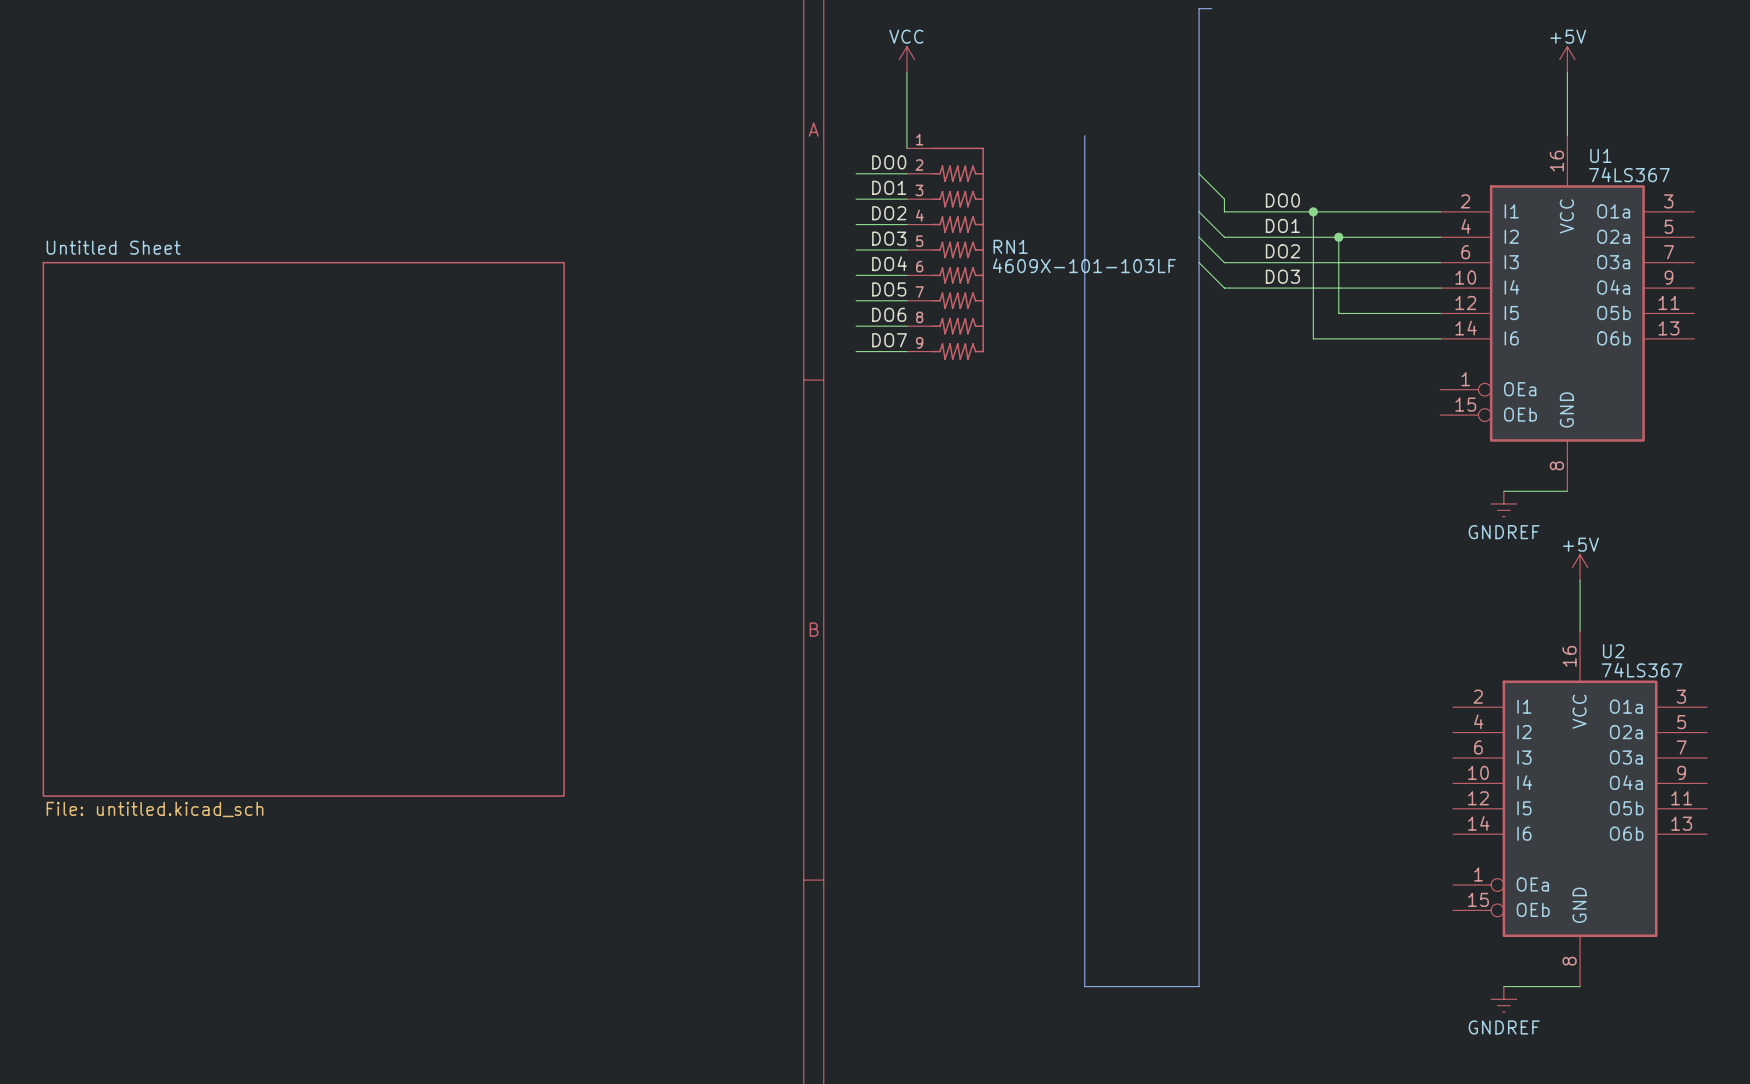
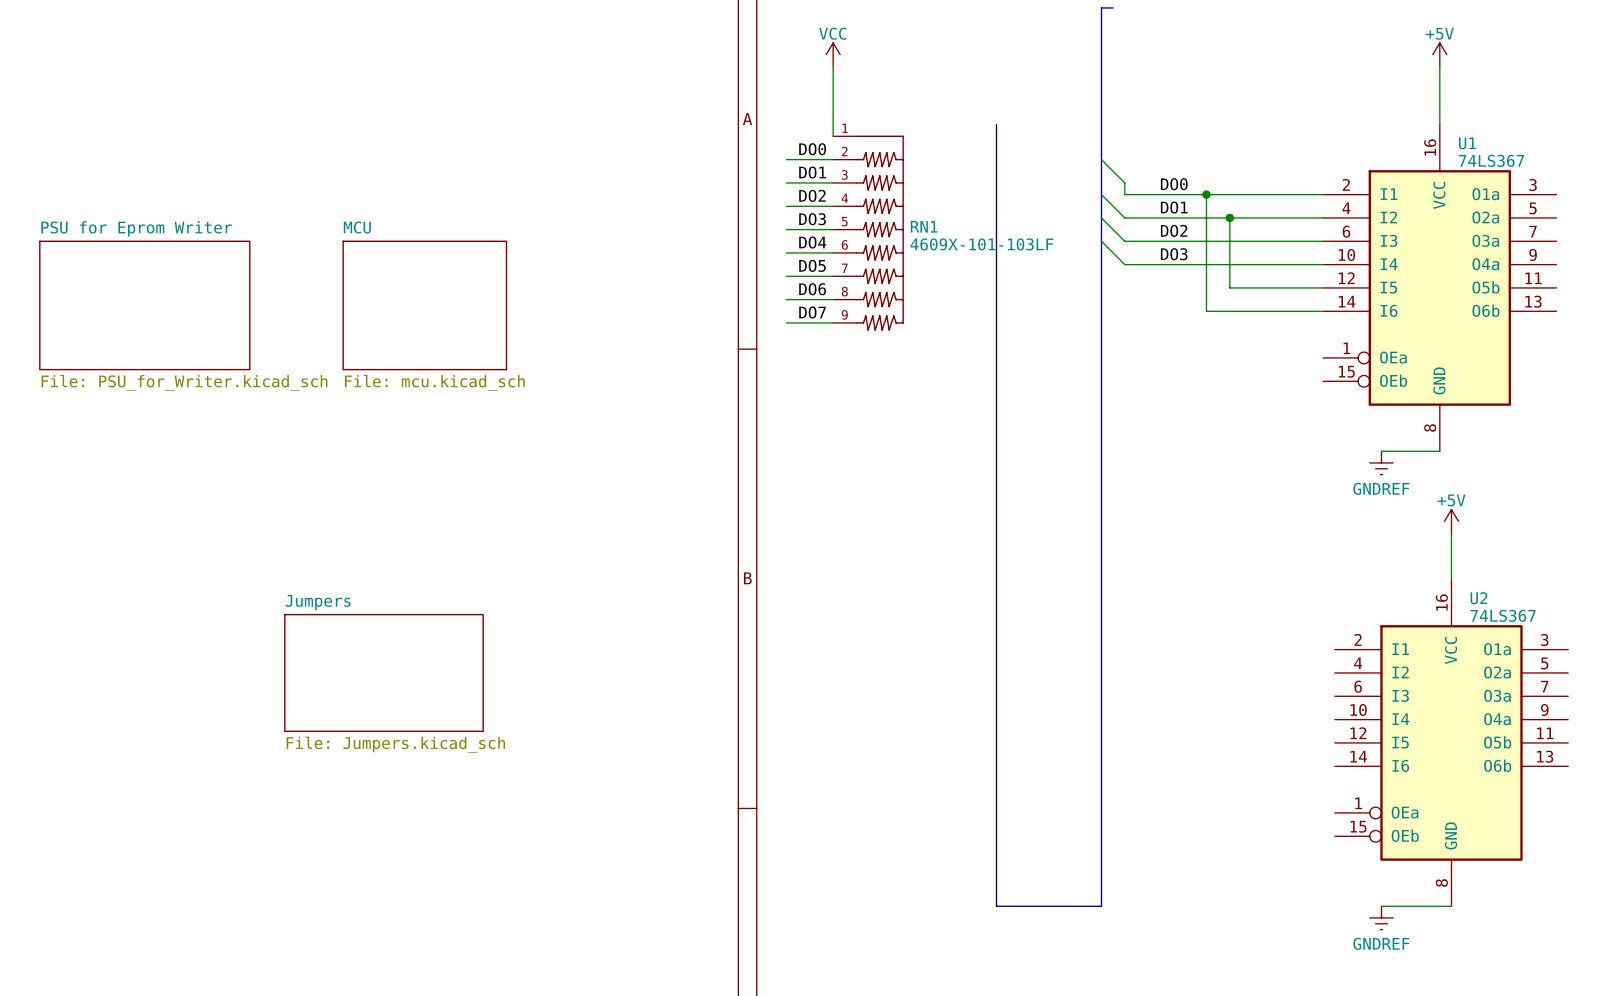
sheet PSU for Eprom Writer: none -> File: PSU_for_Writer.kicad_sch (144, 305)
sheet MCU: none -> File: mcu.kicad_sch (424, 305)
sheet Untitled Sheet: File: untitled.kicad_sch (303, 529) -> none
sheet Jumpers: none -> File: Jumpers.kicad_sch (383, 672)

